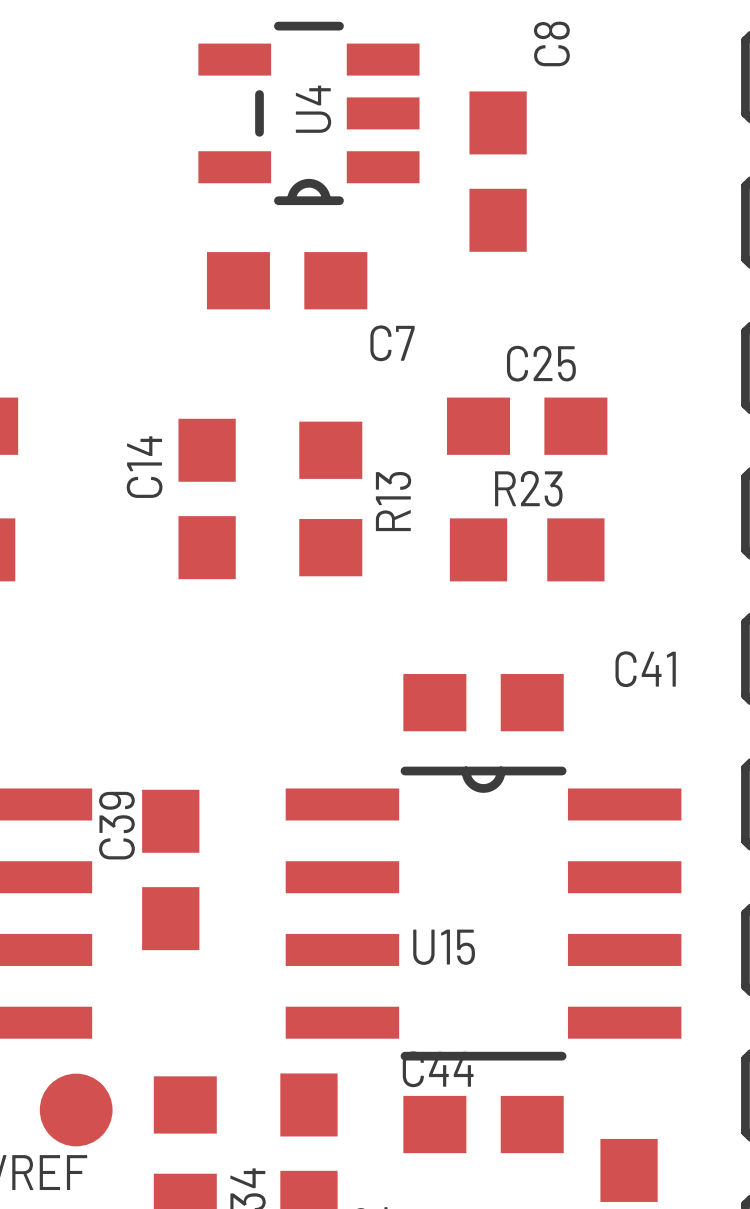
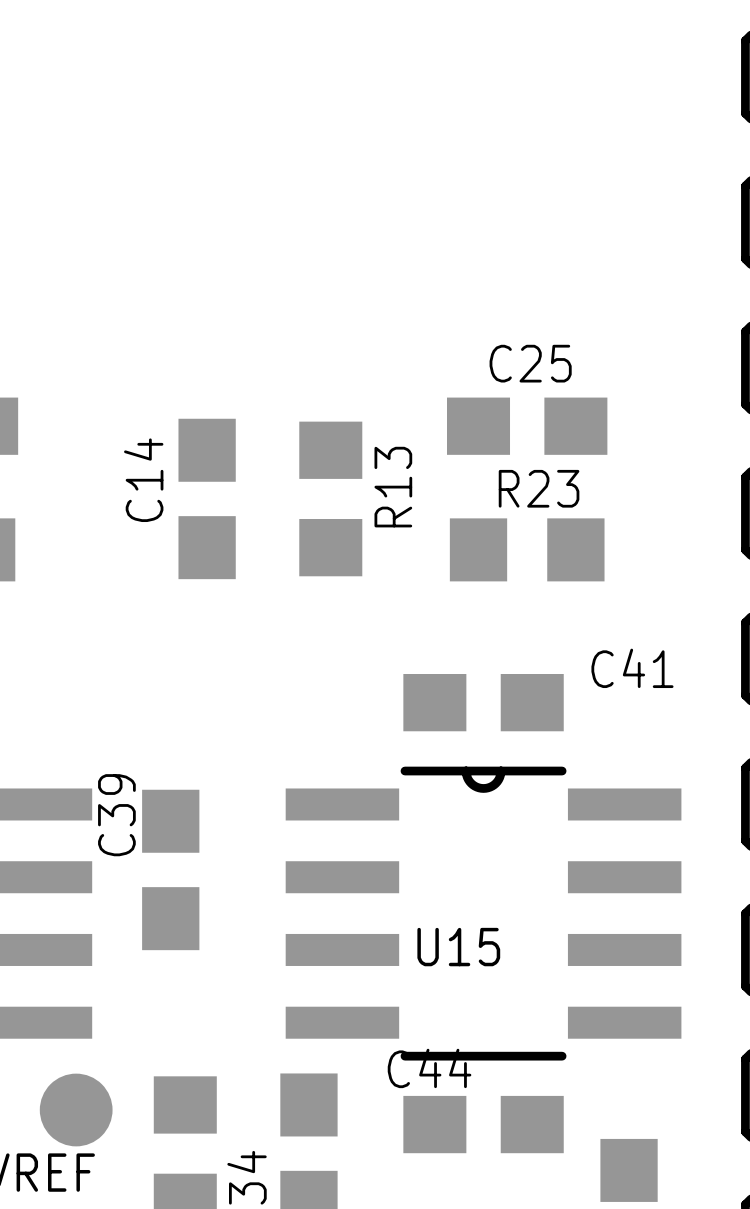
U4: (308, 113) -> none
C8: (498, 171) -> none
C7: (287, 280) -> none

